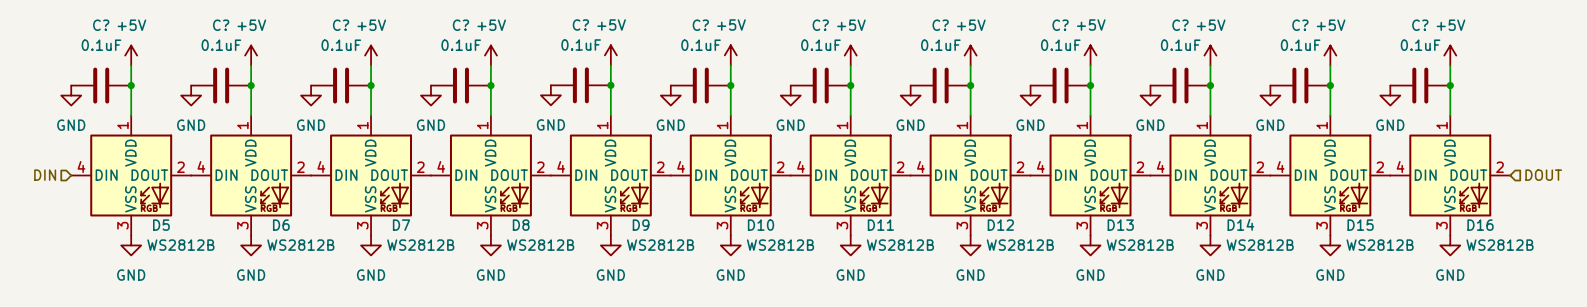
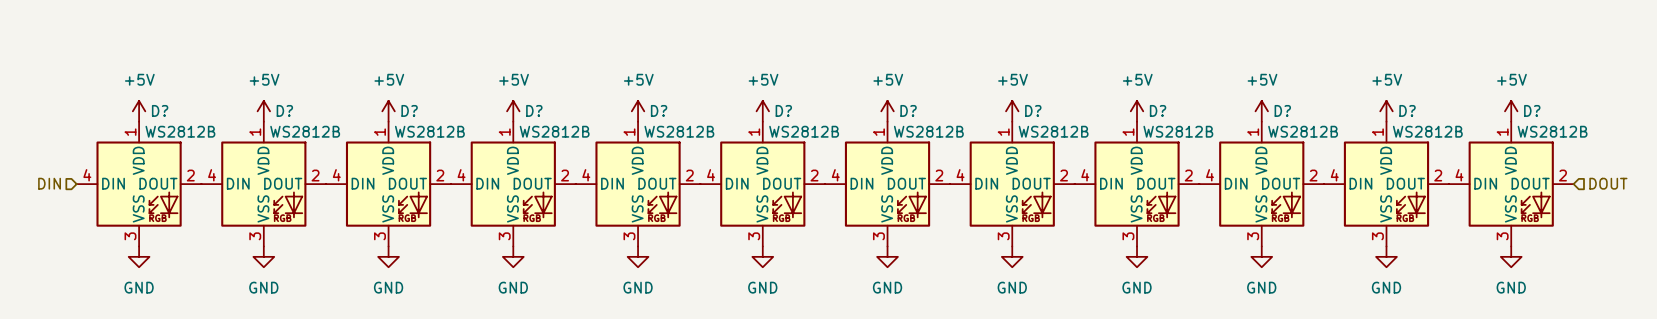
power symbol position: +5V (131, 55) -> +5V (139, 111)
power symbol position: +5V (251, 55) -> +5V (263, 111)
power symbol position: +5V (371, 55) -> +5V (388, 111)
power symbol position: +5V (490, 55) -> +5V (513, 111)
power symbol position: +5V (610, 55) -> +5V (638, 111)
power symbol position: +5V (730, 55) -> +5V (762, 111)
power symbol position: +5V (850, 55) -> +5V (887, 111)
power symbol position: +5V (970, 55) -> +5V (1012, 111)
power symbol position: +5V (1090, 55) -> +5V (1137, 111)
power symbol position: +5V (1210, 55) -> +5V (1261, 111)
power symbol position: +5V (1330, 55) -> +5V (1386, 111)
power symbol position: +5V (1450, 55) -> +5V (1511, 111)
C?: 0.1uF (101, 85) -> none
junction: (131, 85) -> none
C?: 0.1uF (221, 85) -> none
junction: (251, 85) -> none
C?: 0.1uF (341, 85) -> none
junction: (371, 85) -> none
C?: 0.1uF (460, 85) -> none
junction: (490, 85) -> none
C?: 0.1uF (580, 85) -> none
junction: (610, 85) -> none
C?: 0.1uF (700, 85) -> none
junction: (730, 85) -> none
C?: 0.1uF (820, 85) -> none
junction: (850, 85) -> none
C?: 0.1uF (940, 85) -> none
junction: (970, 85) -> none
C?: 0.1uF (1060, 85) -> none
junction: (1090, 85) -> none
C?: 0.1uF (1180, 85) -> none
junction: (1210, 85) -> none
C?: 0.1uF (1300, 85) -> none
junction: (1330, 85) -> none
C?: 0.1uF (1420, 85) -> none
junction: (1450, 85) -> none
power symbol: GND (71, 95) -> none
power symbol: GND (191, 95) -> none
power symbol: GND (311, 95) -> none
power symbol: GND (430, 95) -> none
power symbol: GND (550, 95) -> none
power symbol: GND (670, 95) -> none
power symbol: GND (790, 95) -> none
power symbol: GND (910, 95) -> none
power symbol: GND (1030, 95) -> none
power symbol: GND (1150, 95) -> none
power symbol: GND (1270, 95) -> none
power symbol: GND (1390, 95) -> none
D14 name: D14 (1240, 224) -> D? (1282, 110)
D5 name: D5 (161, 225) -> D? (160, 110)
D6 name: D6 (281, 225) -> D? (284, 110)
D7 name: D7 (401, 225) -> D? (409, 110)
D8 name: D8 (521, 225) -> D? (534, 110)
D9 name: D9 (641, 225) -> D? (659, 110)
D10 name: D10 (761, 225) -> D? (783, 110)
D11 name: D11 (880, 225) -> D? (908, 110)
D12 name: D12 (1000, 225) -> D? (1033, 110)
D13 name: D13 (1120, 225) -> D? (1158, 110)
D15 name: D15 (1360, 225) -> D? (1407, 110)
D16 name: D16 (1480, 225) -> D? (1532, 110)
D5 value position: WS2812B (180, 245) -> WS2812B (180, 131)
D6 value position: WS2812B (300, 245) -> WS2812B (305, 131)
D7 value position: WS2812B (420, 245) -> WS2812B (429, 131)
D8 value position: WS2812B (540, 245) -> WS2812B (554, 131)
D9 value position: WS2812B (660, 245) -> WS2812B (679, 131)
D10 value position: WS2812B (780, 245) -> WS2812B (804, 131)
D11 value position: WS2812B (900, 245) -> WS2812B (928, 131)
D12 value position: WS2812B (1020, 245) -> WS2812B (1053, 131)
D13 value position: WS2812B (1140, 245) -> WS2812B (1178, 131)
D14 value position: WS2812B (1260, 245) -> WS2812B (1303, 131)
D15 value position: WS2812B (1380, 245) -> WS2812B (1427, 131)
D16 value position: WS2812B (1500, 245) -> WS2812B (1552, 131)

